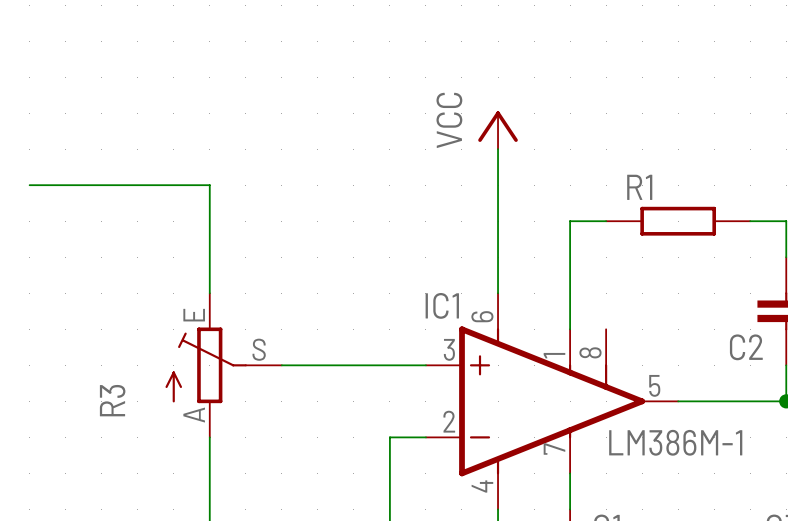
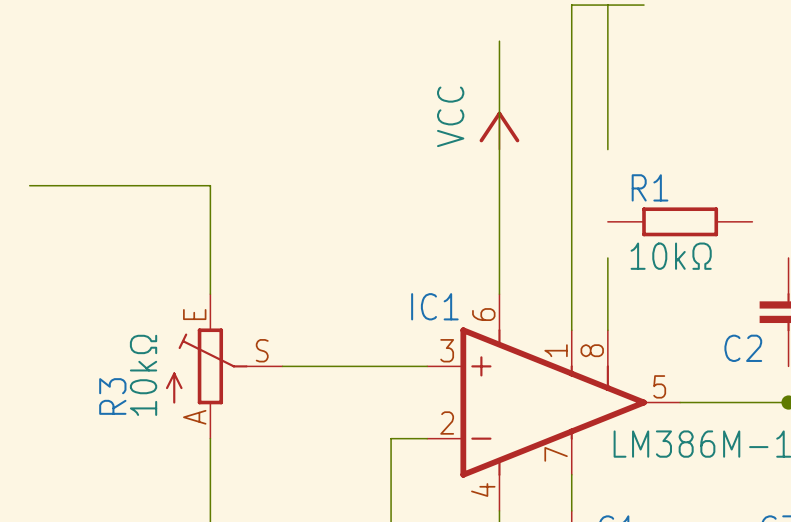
wire: none -> (607, 5) (607, 149)
wire: none -> (499, 41) (499, 149)
wire: (570, 221) (606, 221) -> (571, 221) (571, 5) (644, 5)
wire: (750, 221) (786, 221) (786, 257) -> none
R1 value: none -> 10kΩ (671, 256)
wire: none -> (607, 257) (607, 330)
wire: (786, 365) (786, 401) -> none
R3 value: none -> 10kΩ (143, 375)

